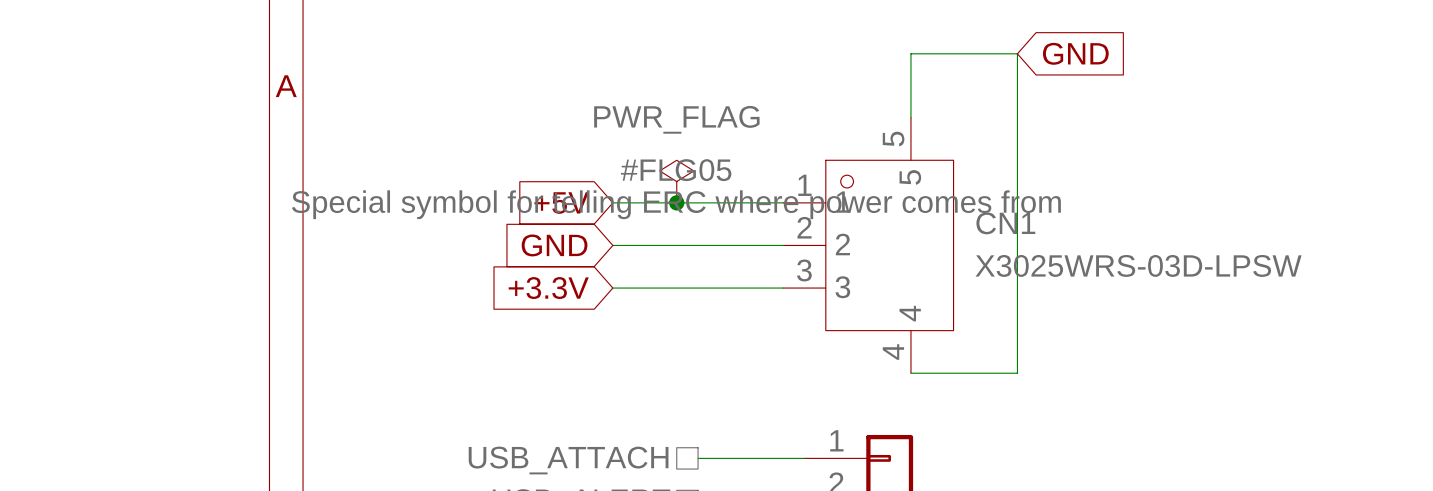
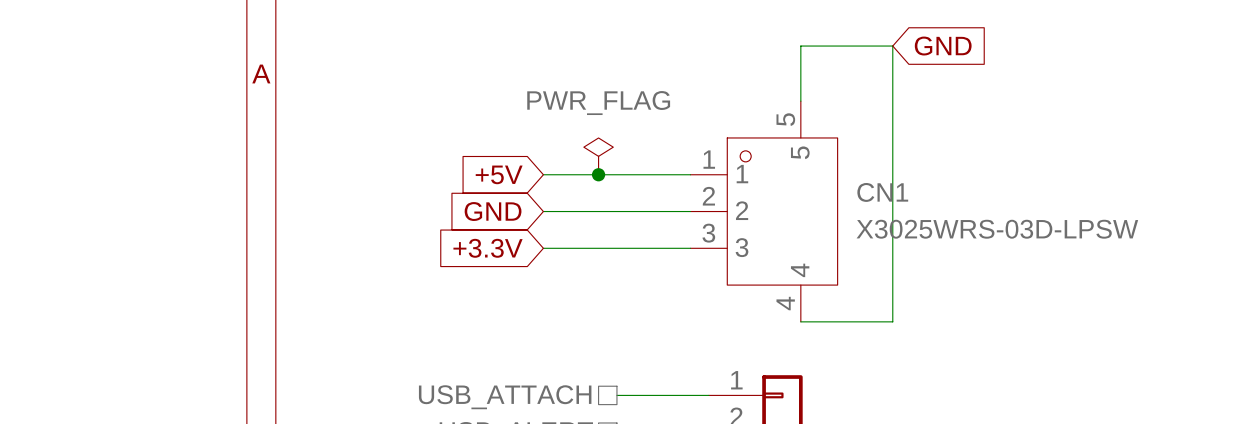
#FLG05 name: #FLG05 (676, 170) -> none
#FLG05 text: Special symbol for telling ERC where power comes from (676, 204) -> none

